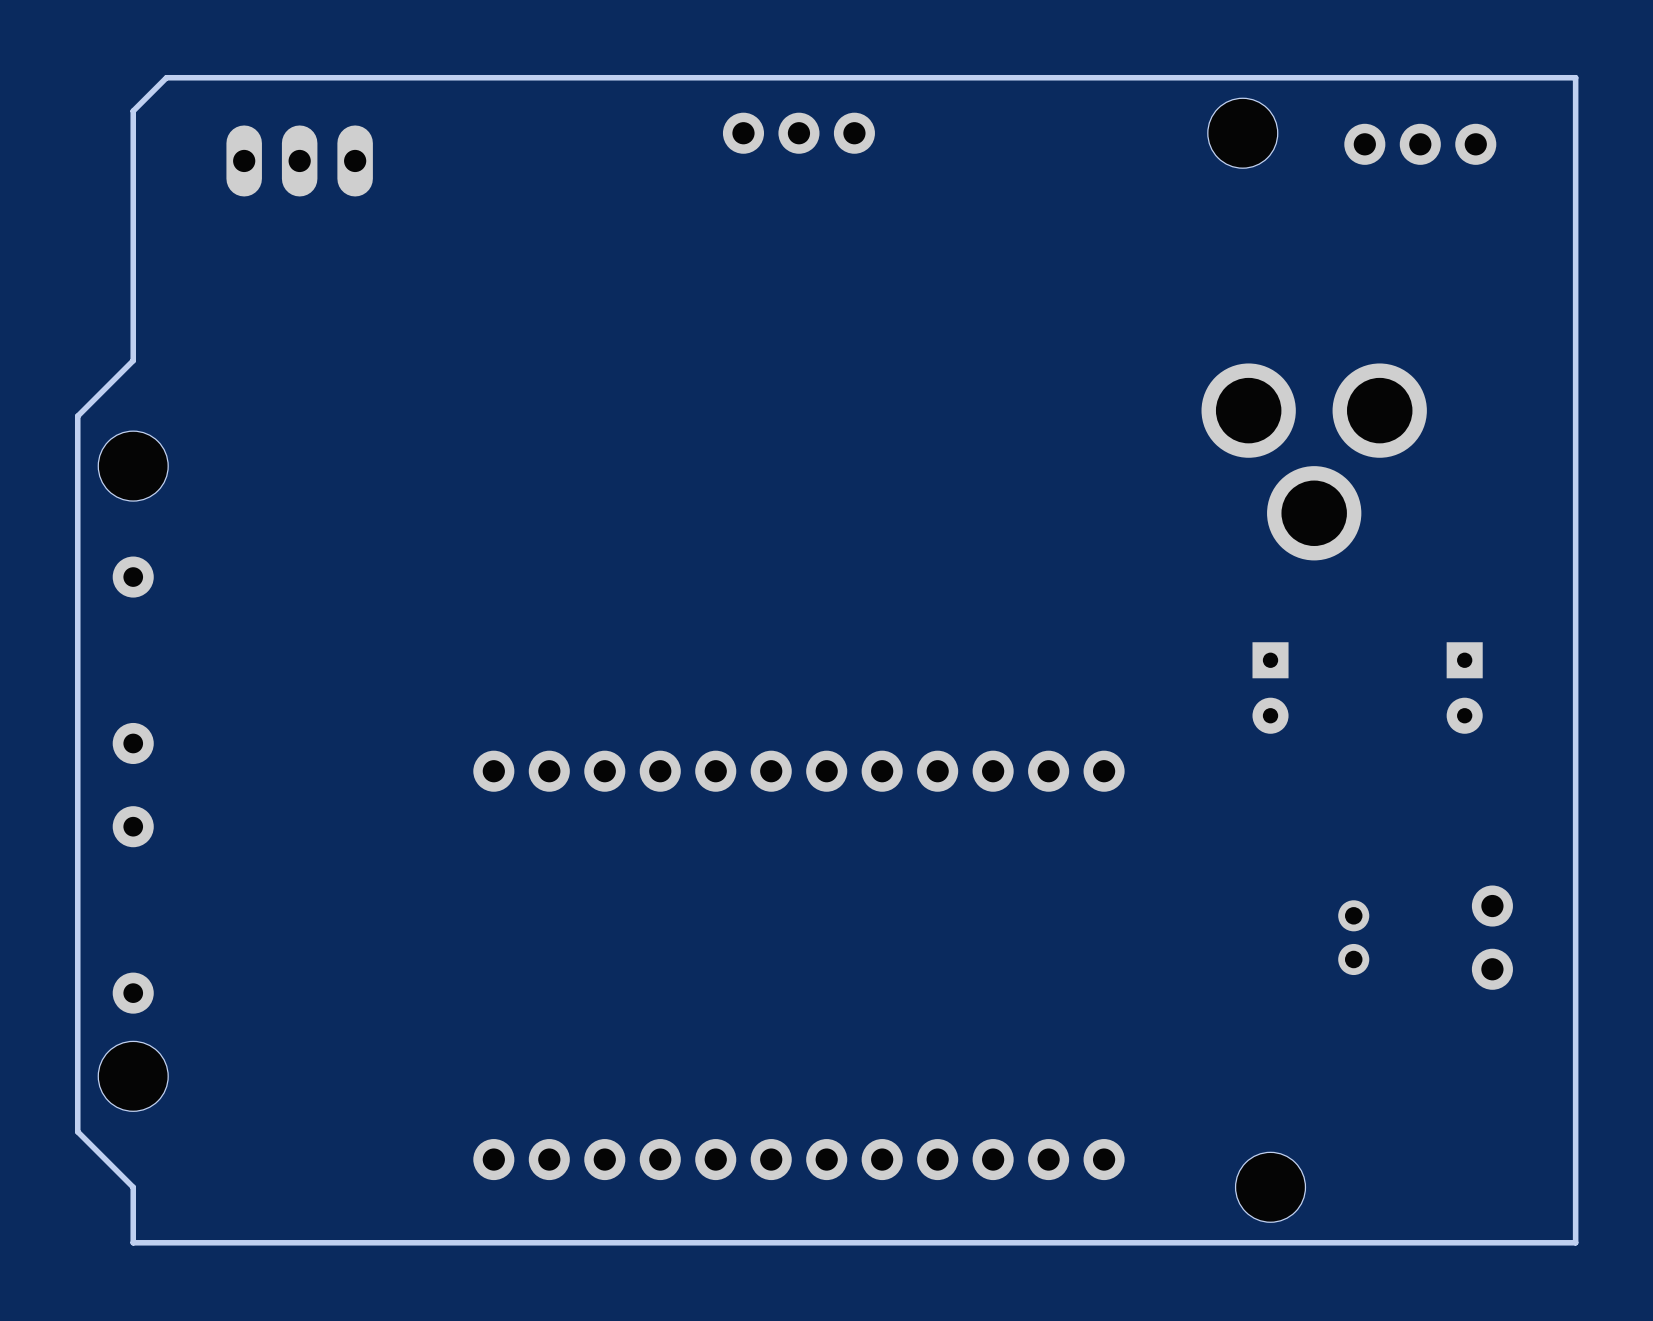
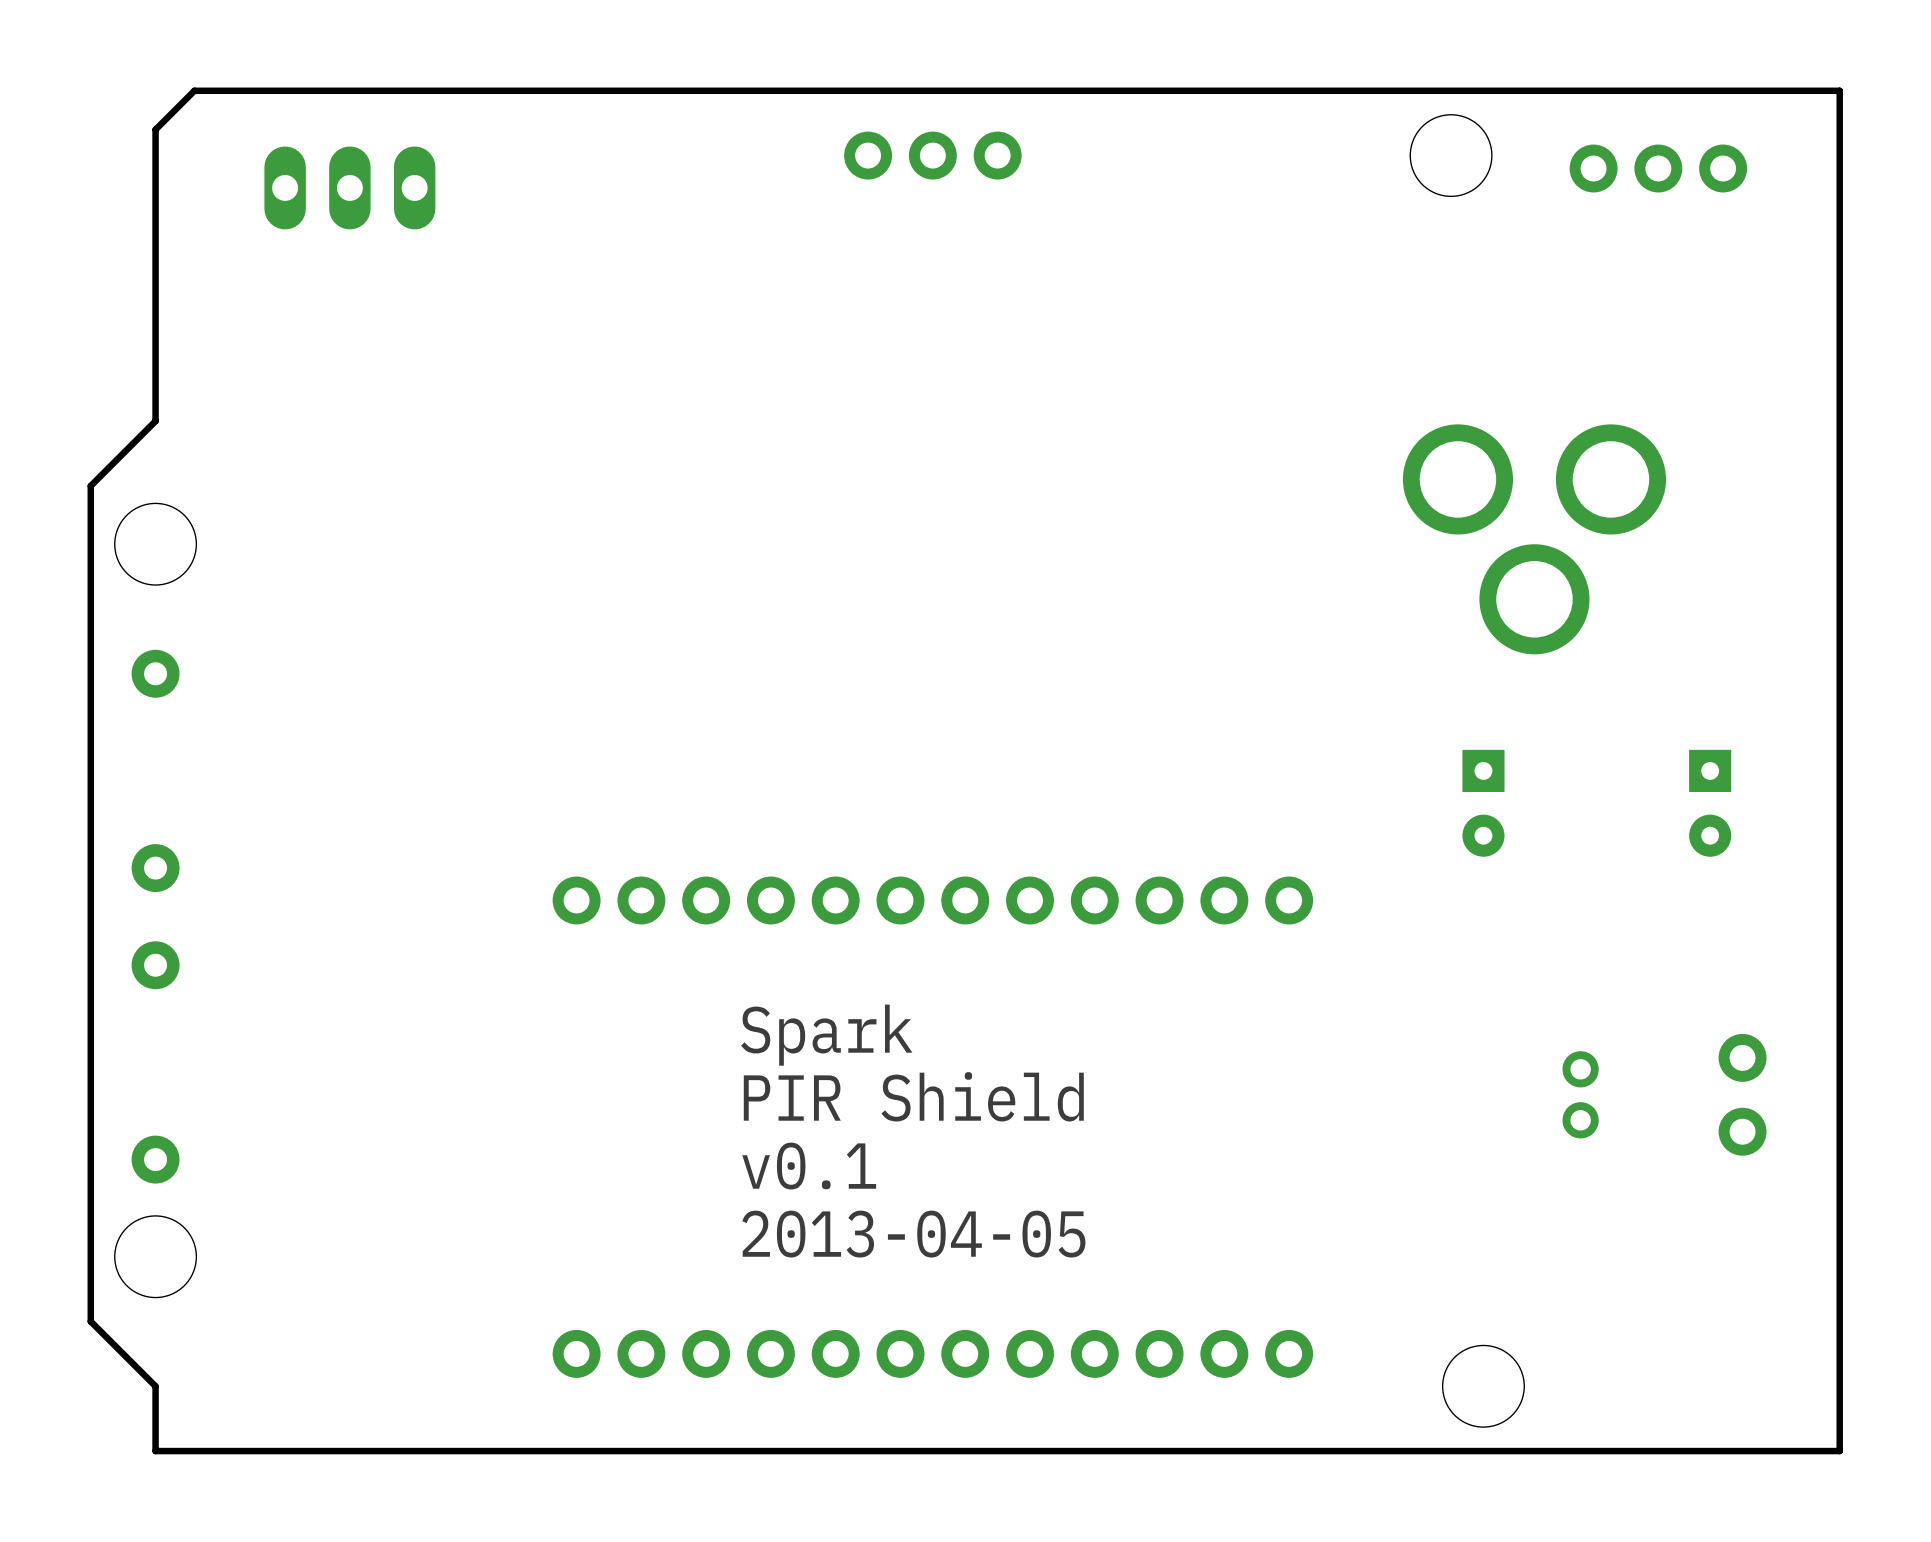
text: none -> Spark (826, 1035)
text: none -> PIR Shield (913, 1096)
text: none -> v0.1 (809, 1166)
text: none -> 2013-04-05 (913, 1234)

